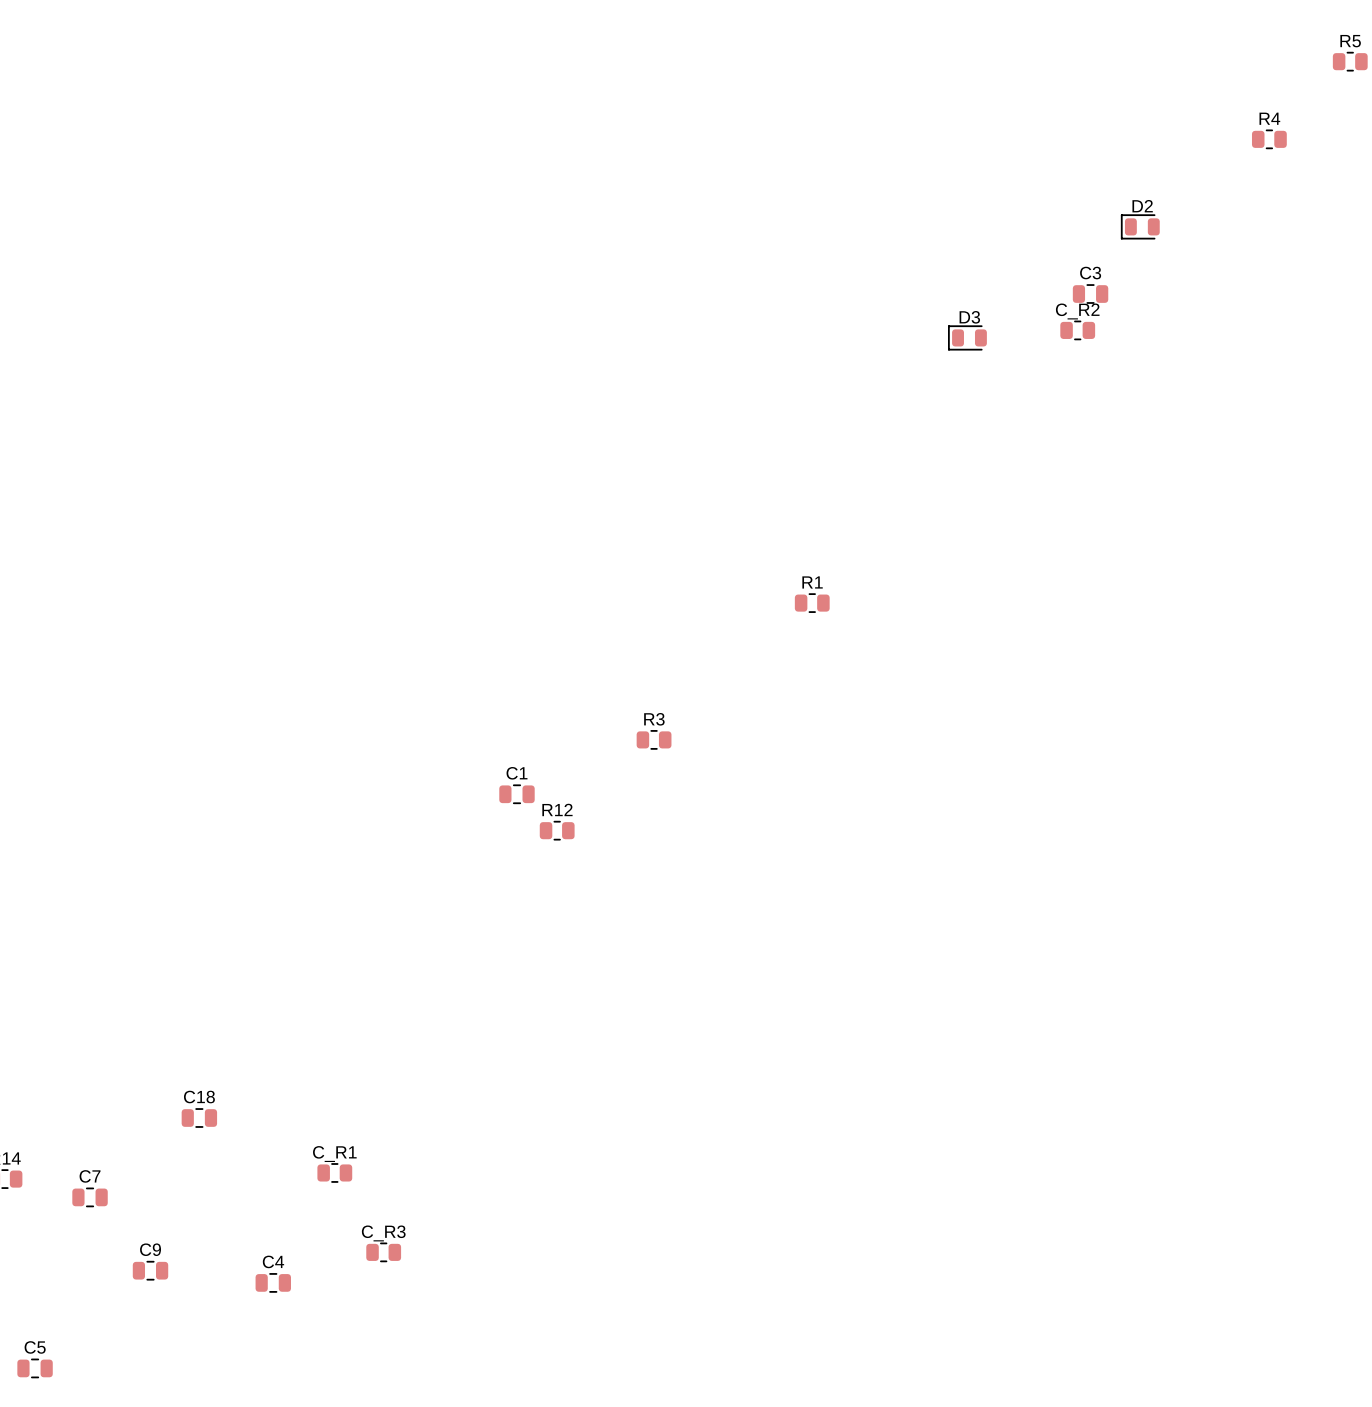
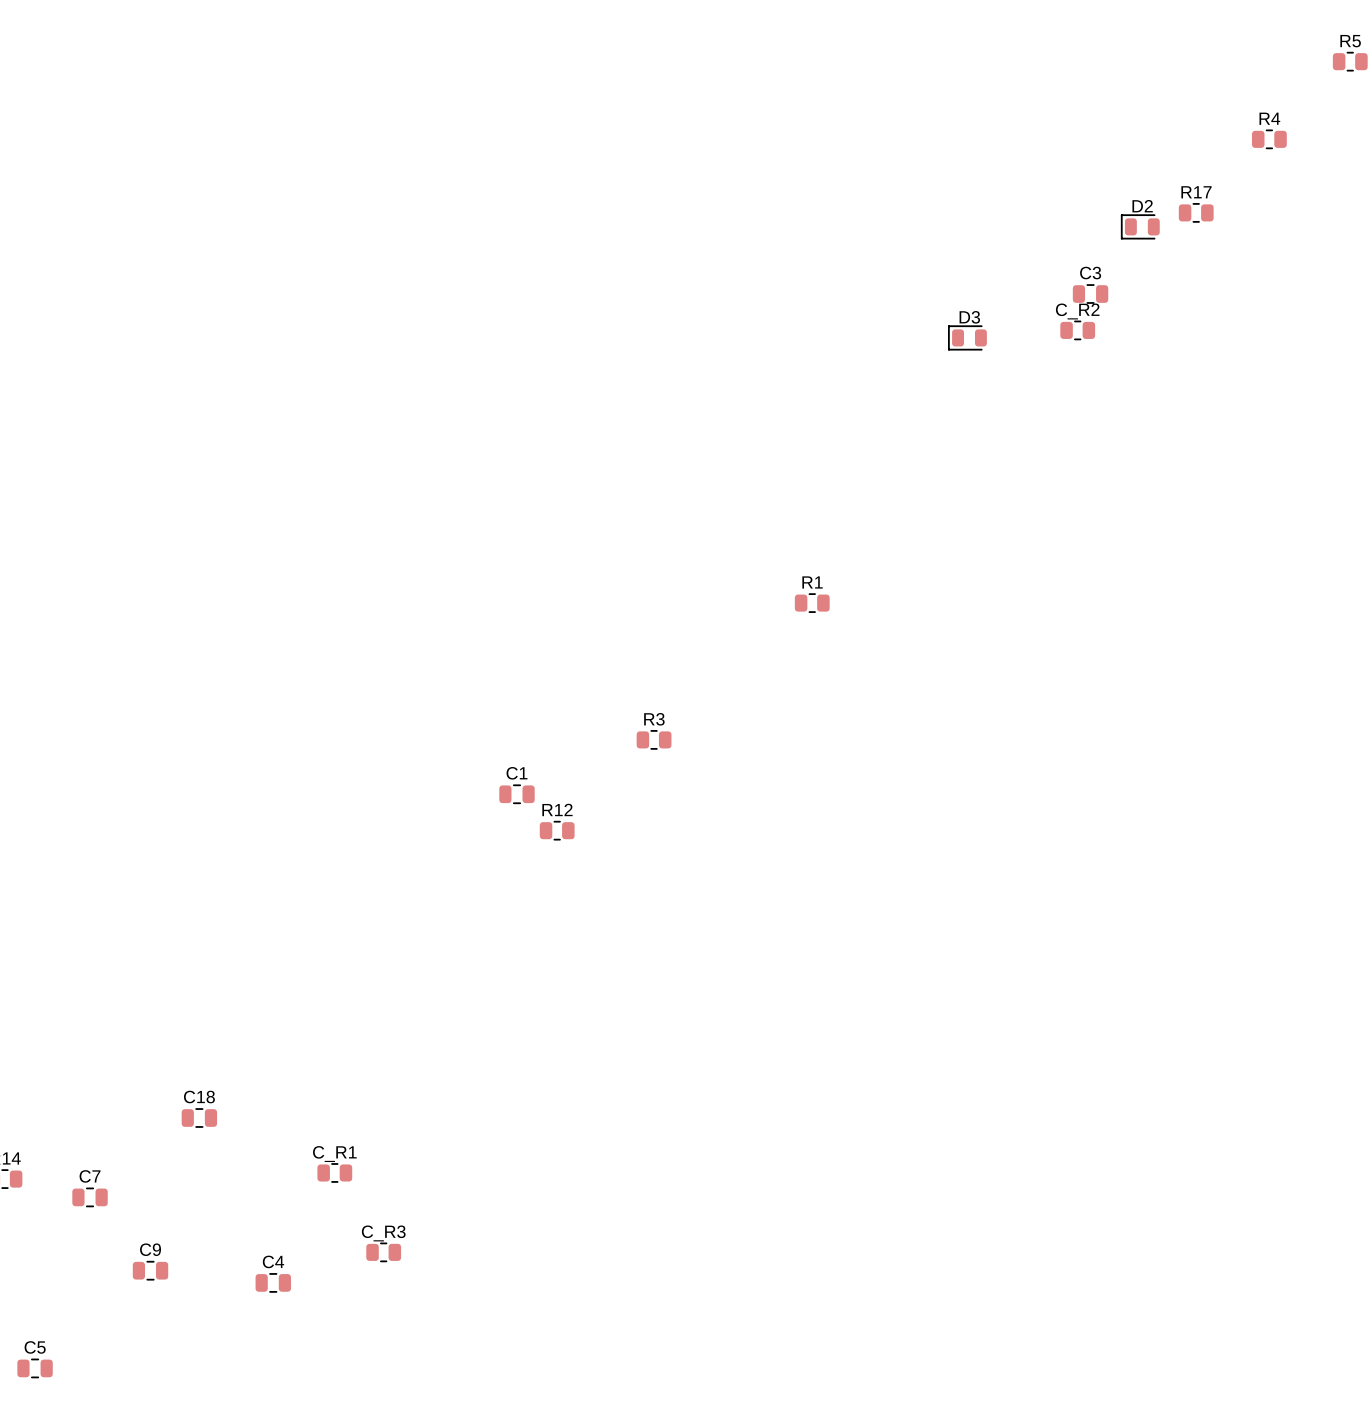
R17: none -> (1196, 212)

